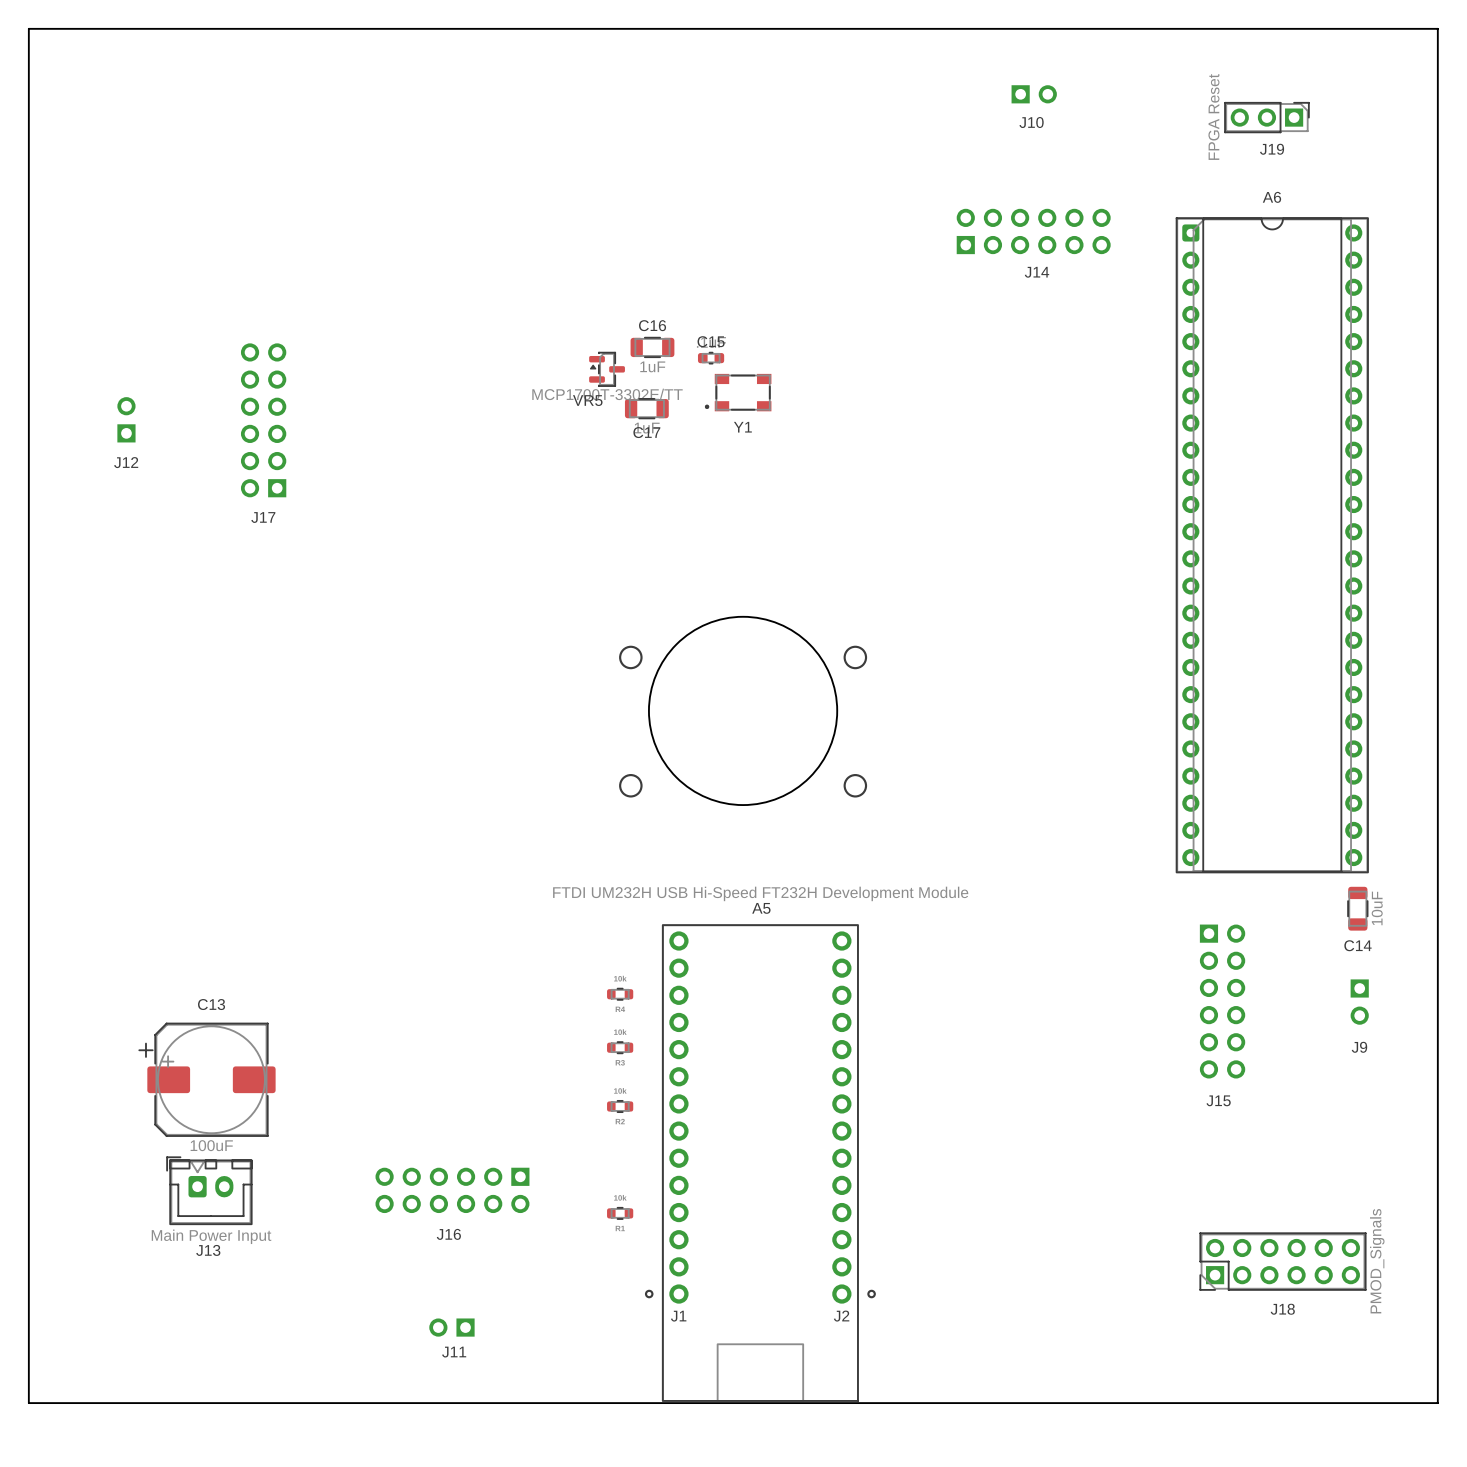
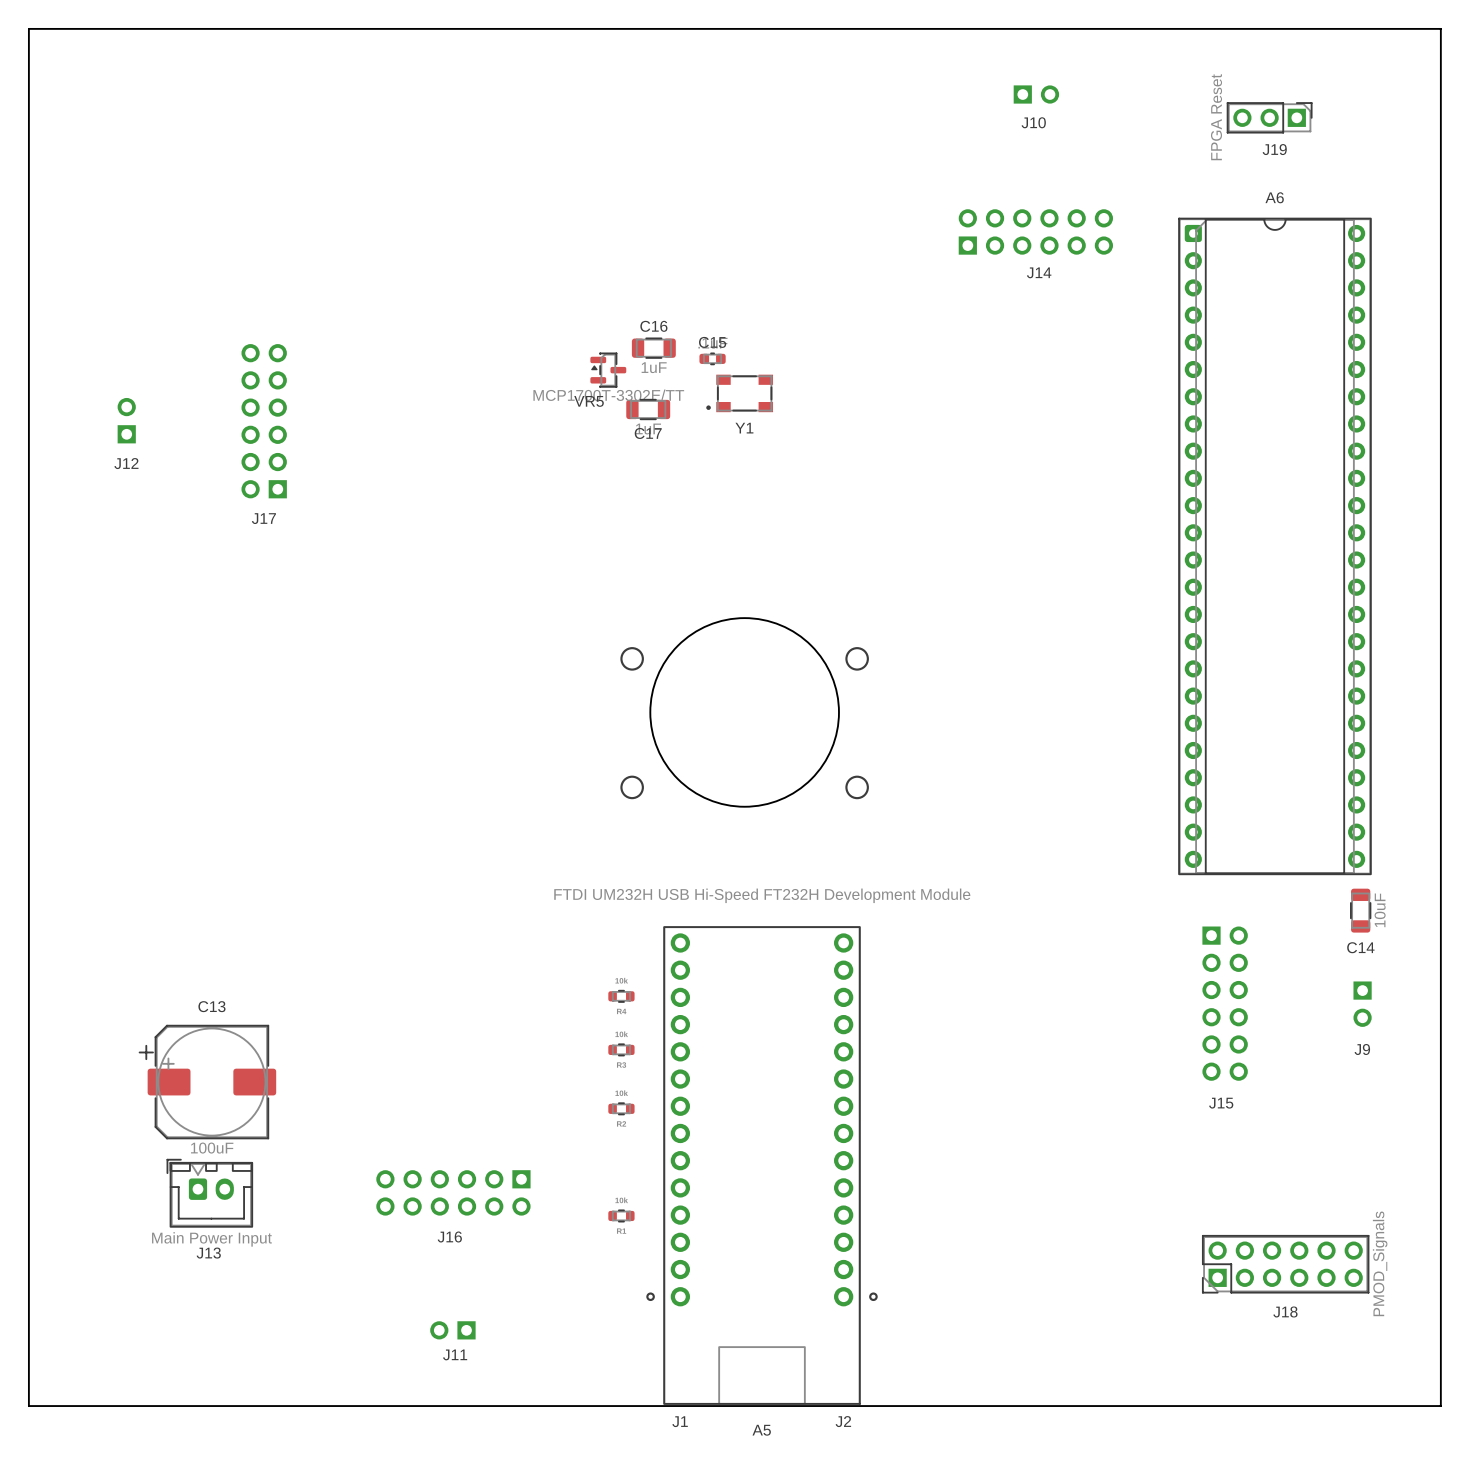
A5 name position: A5 (761, 908) -> A5 (761, 1430)
A5 text position: J1 (678, 1316) -> J1 (680, 1421)
A5 text position: J2 (841, 1316) -> J2 (843, 1421)

